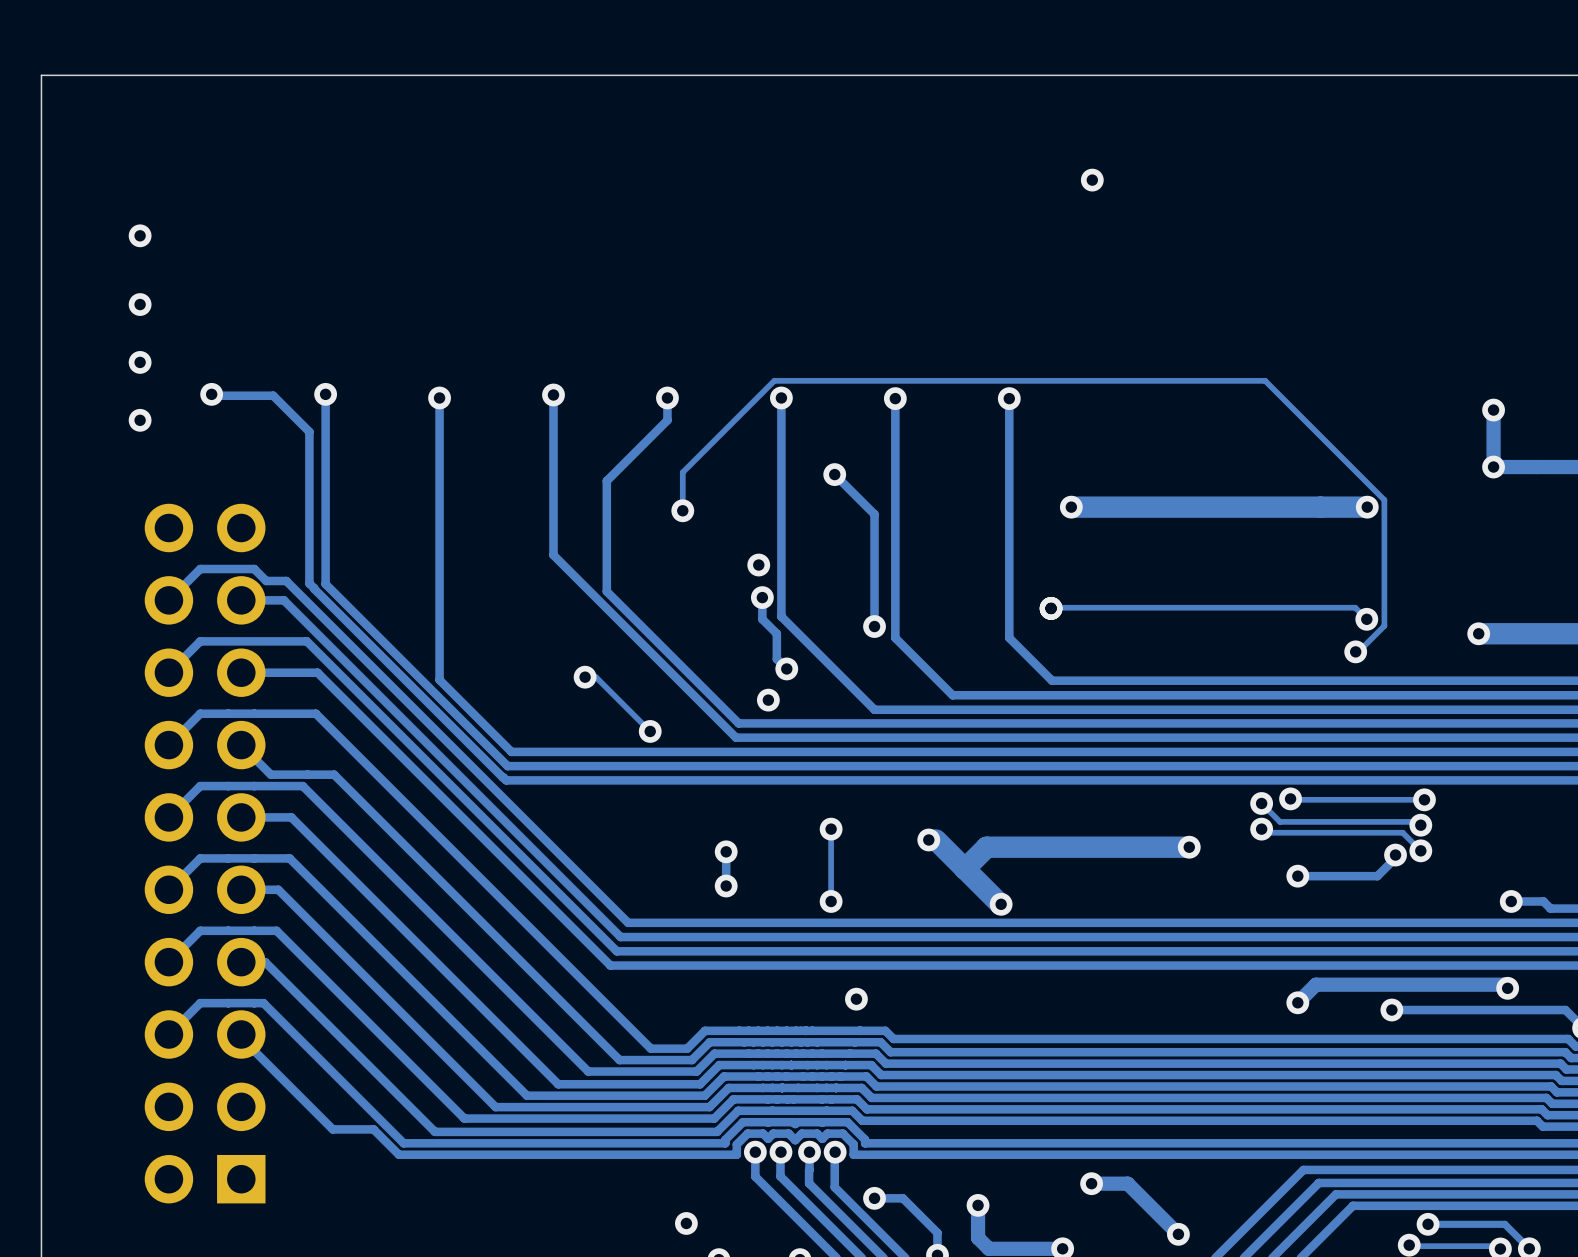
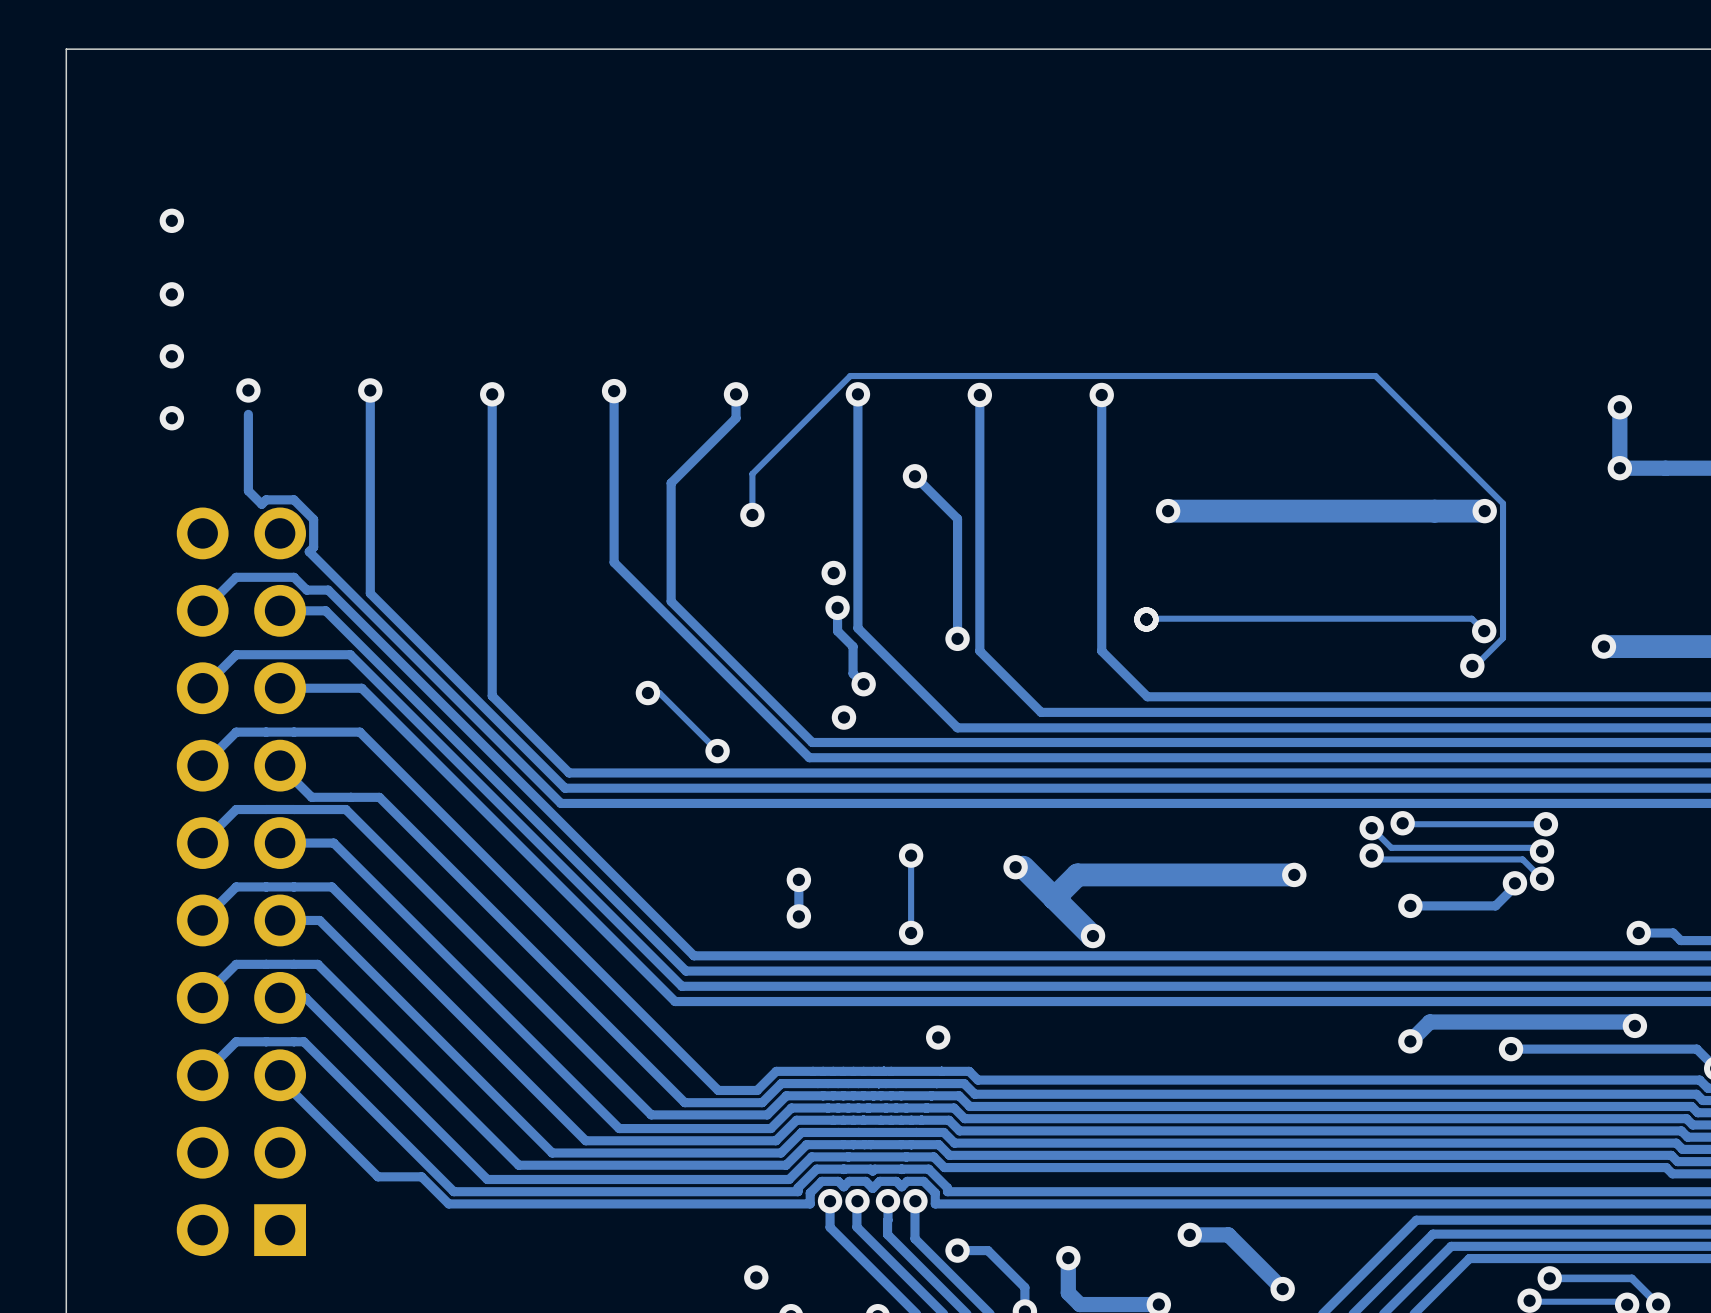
via: (1092, 180) -> none
track: (211, 394) (273, 395) (309, 431) (309, 583) (506, 780) -> (248, 414) (248, 490) (261, 504) (266, 499) (293, 499) (313, 519) (313, 547) (309, 551) (560, 803) (563, 803)

